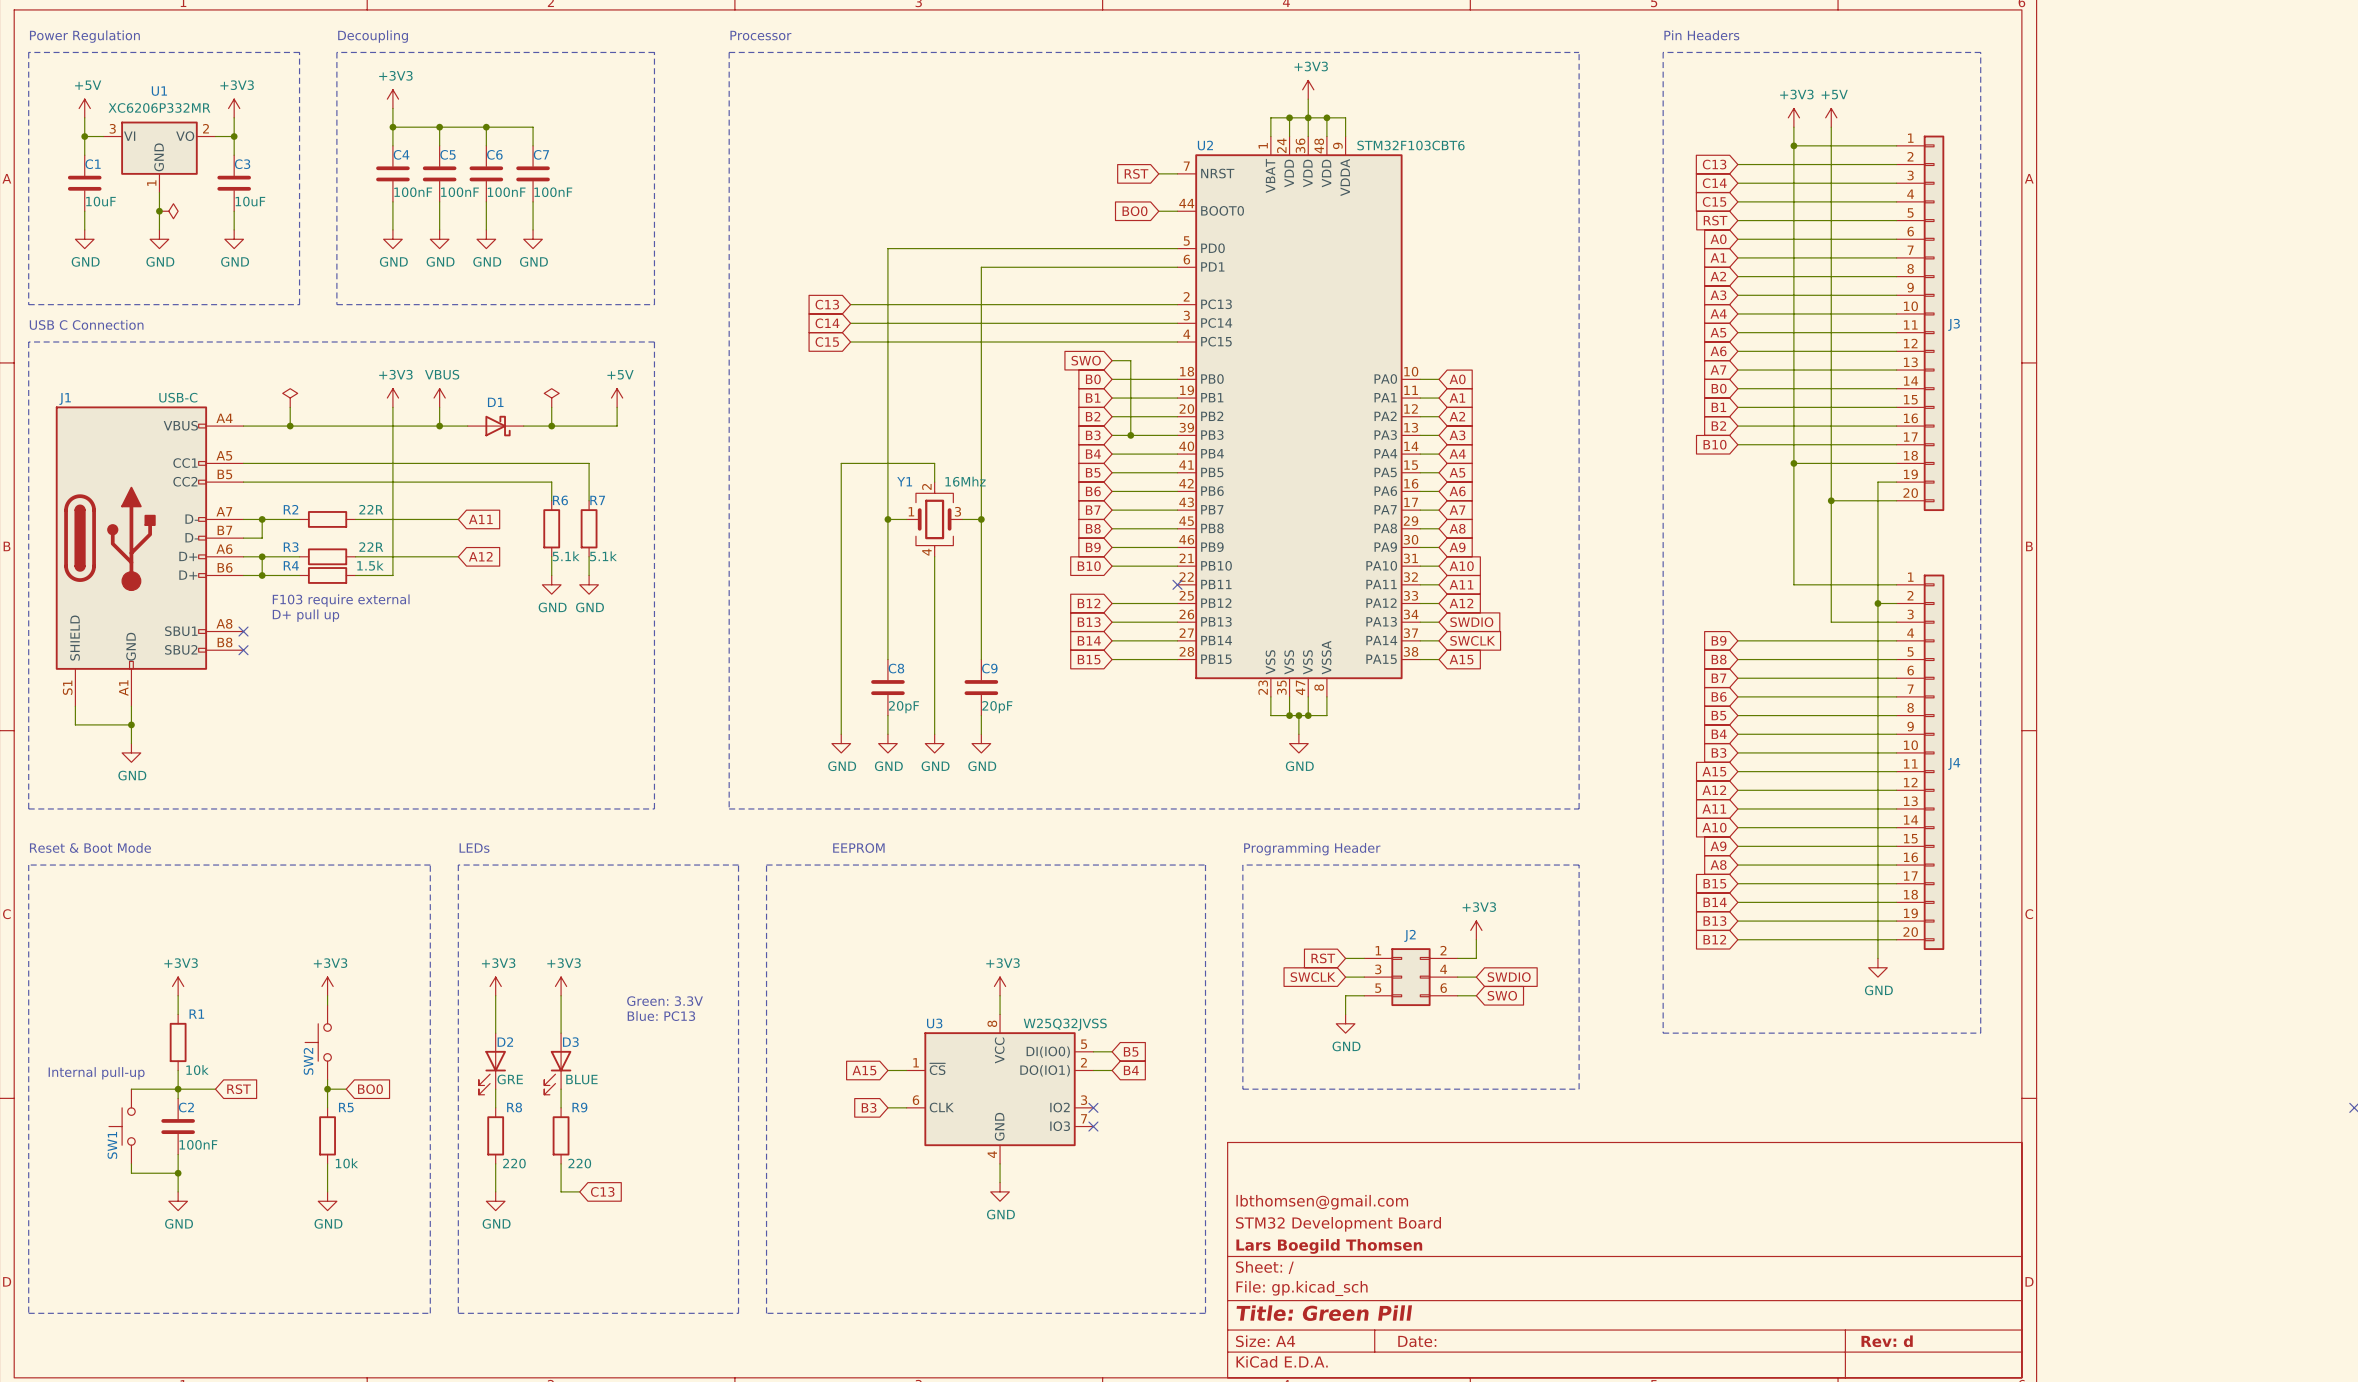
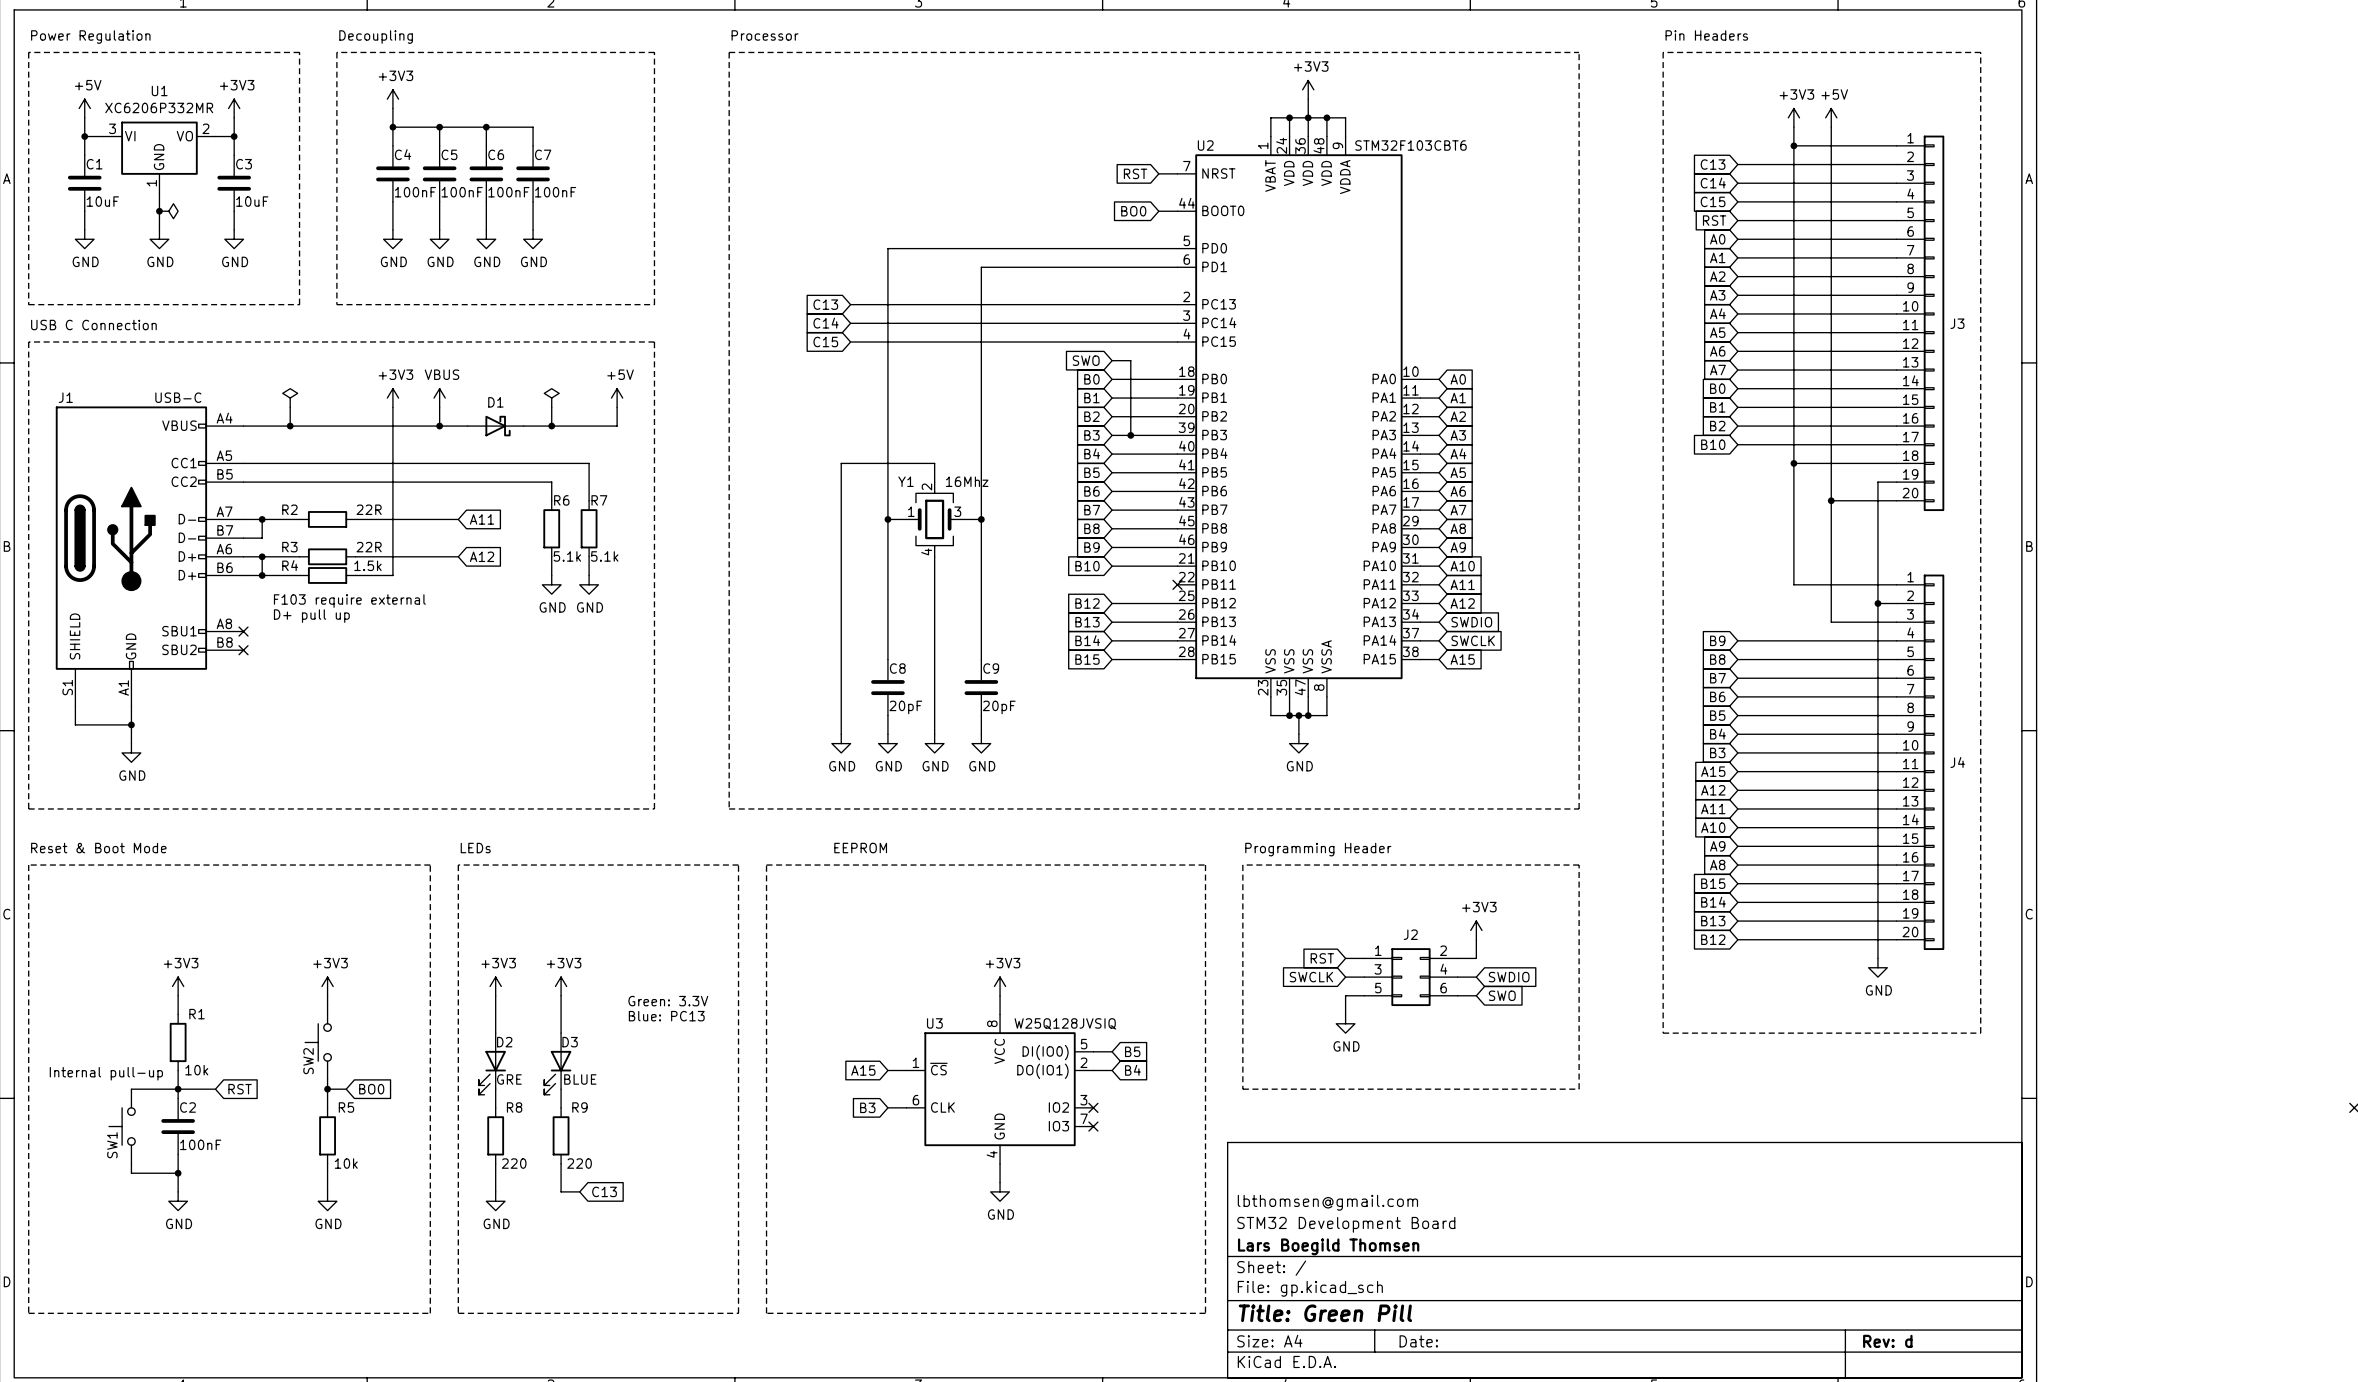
U3 value: W25Q32JVSS (1065, 1024) -> W25Q128JVSIQ (1065, 1023)

